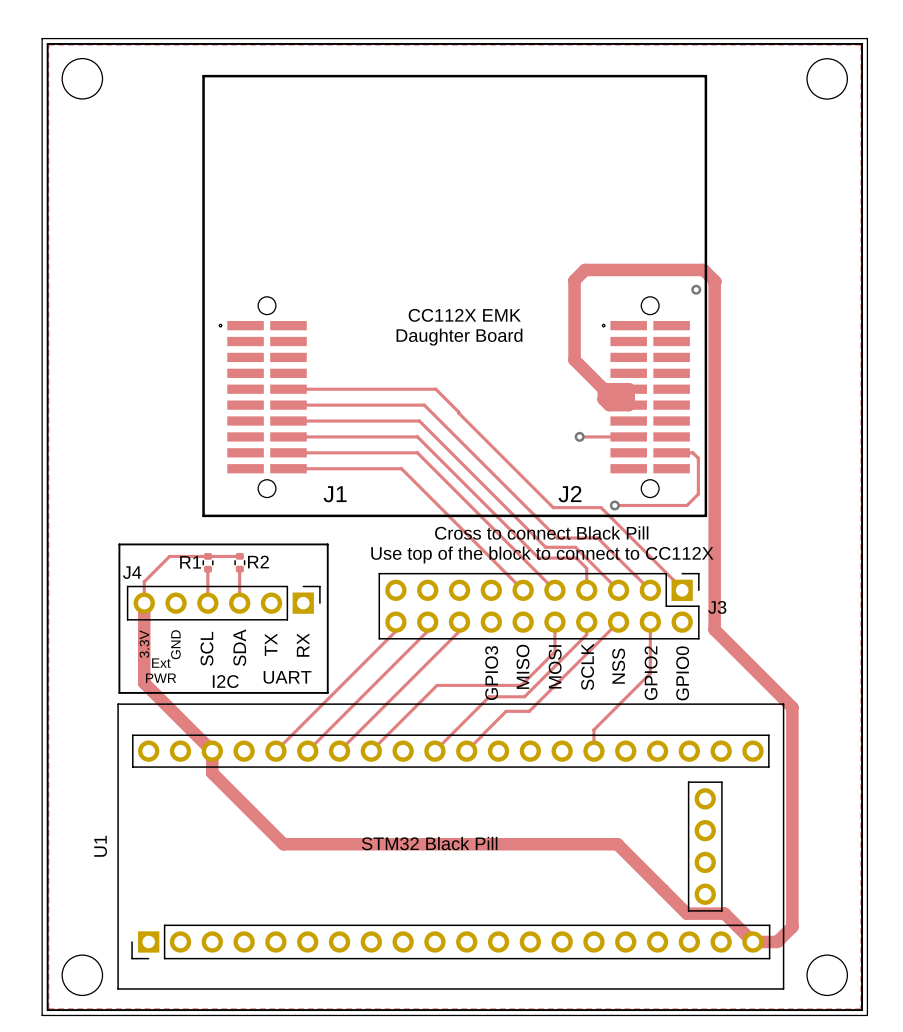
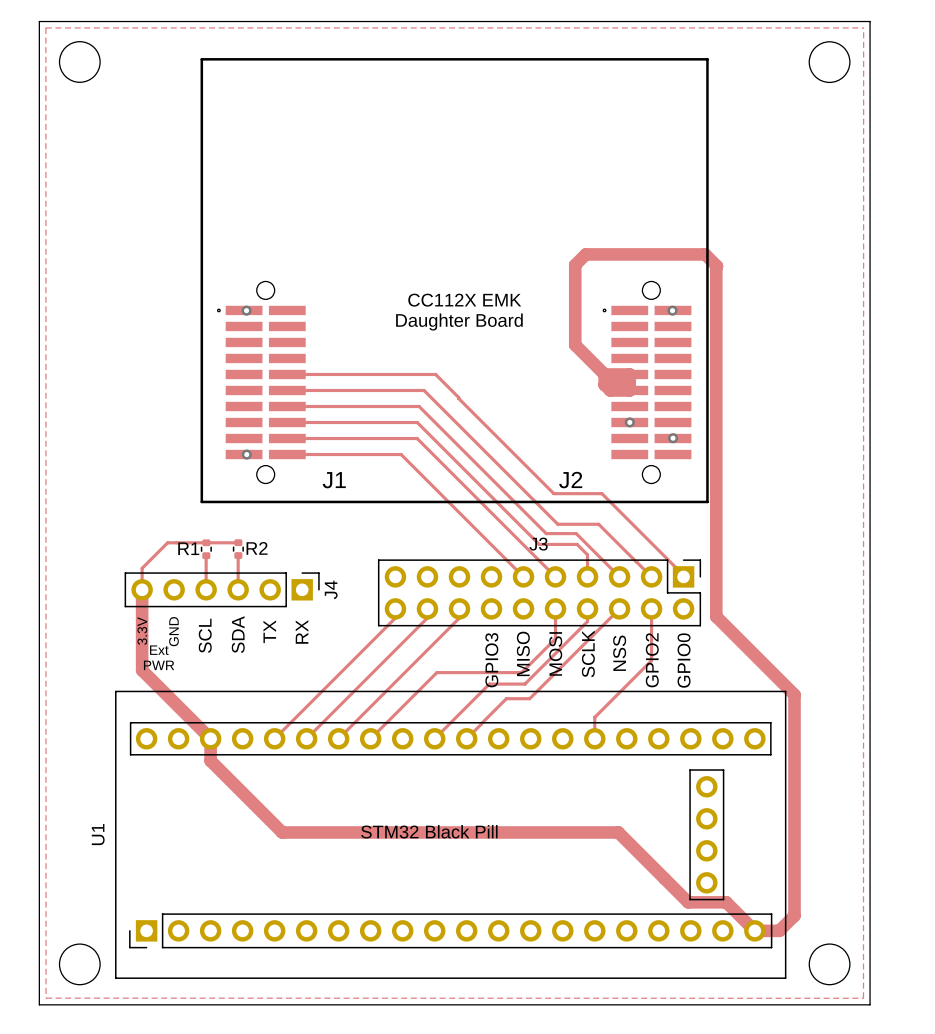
line: (47, 43) (862, 43) (862, 1010) (47, 1010) (47, 43) -> none
via position: (696, 289) -> (672, 310)
via: none -> (246, 310)
track: (579, 436) (628, 436) -> none
via: (579, 436) -> none
via: none -> (629, 422)
track: (671, 452) (692, 452) (698, 458) (698, 494) (686, 505) (614, 505) -> none
via: none -> (673, 438)
via: none -> (246, 454)
via: (614, 505) -> none
text: Cross to connect Black Pill (541, 533) -> none
line: (119, 544) (327, 544) (327, 692) (119, 692) (119, 544) -> none
text: Use top of the block to connect to CC112X (542, 554) -> none
J4 name rotation: 0° (132, 572) -> 90° counterclockwise (331, 589)
J4 name position: J4 (132, 572) -> J4 (331, 589)
J3 name position: J3 (717, 607) -> J3 (538, 544)
text: UART (287, 677) -> none
text: I2C (225, 681) -> none

